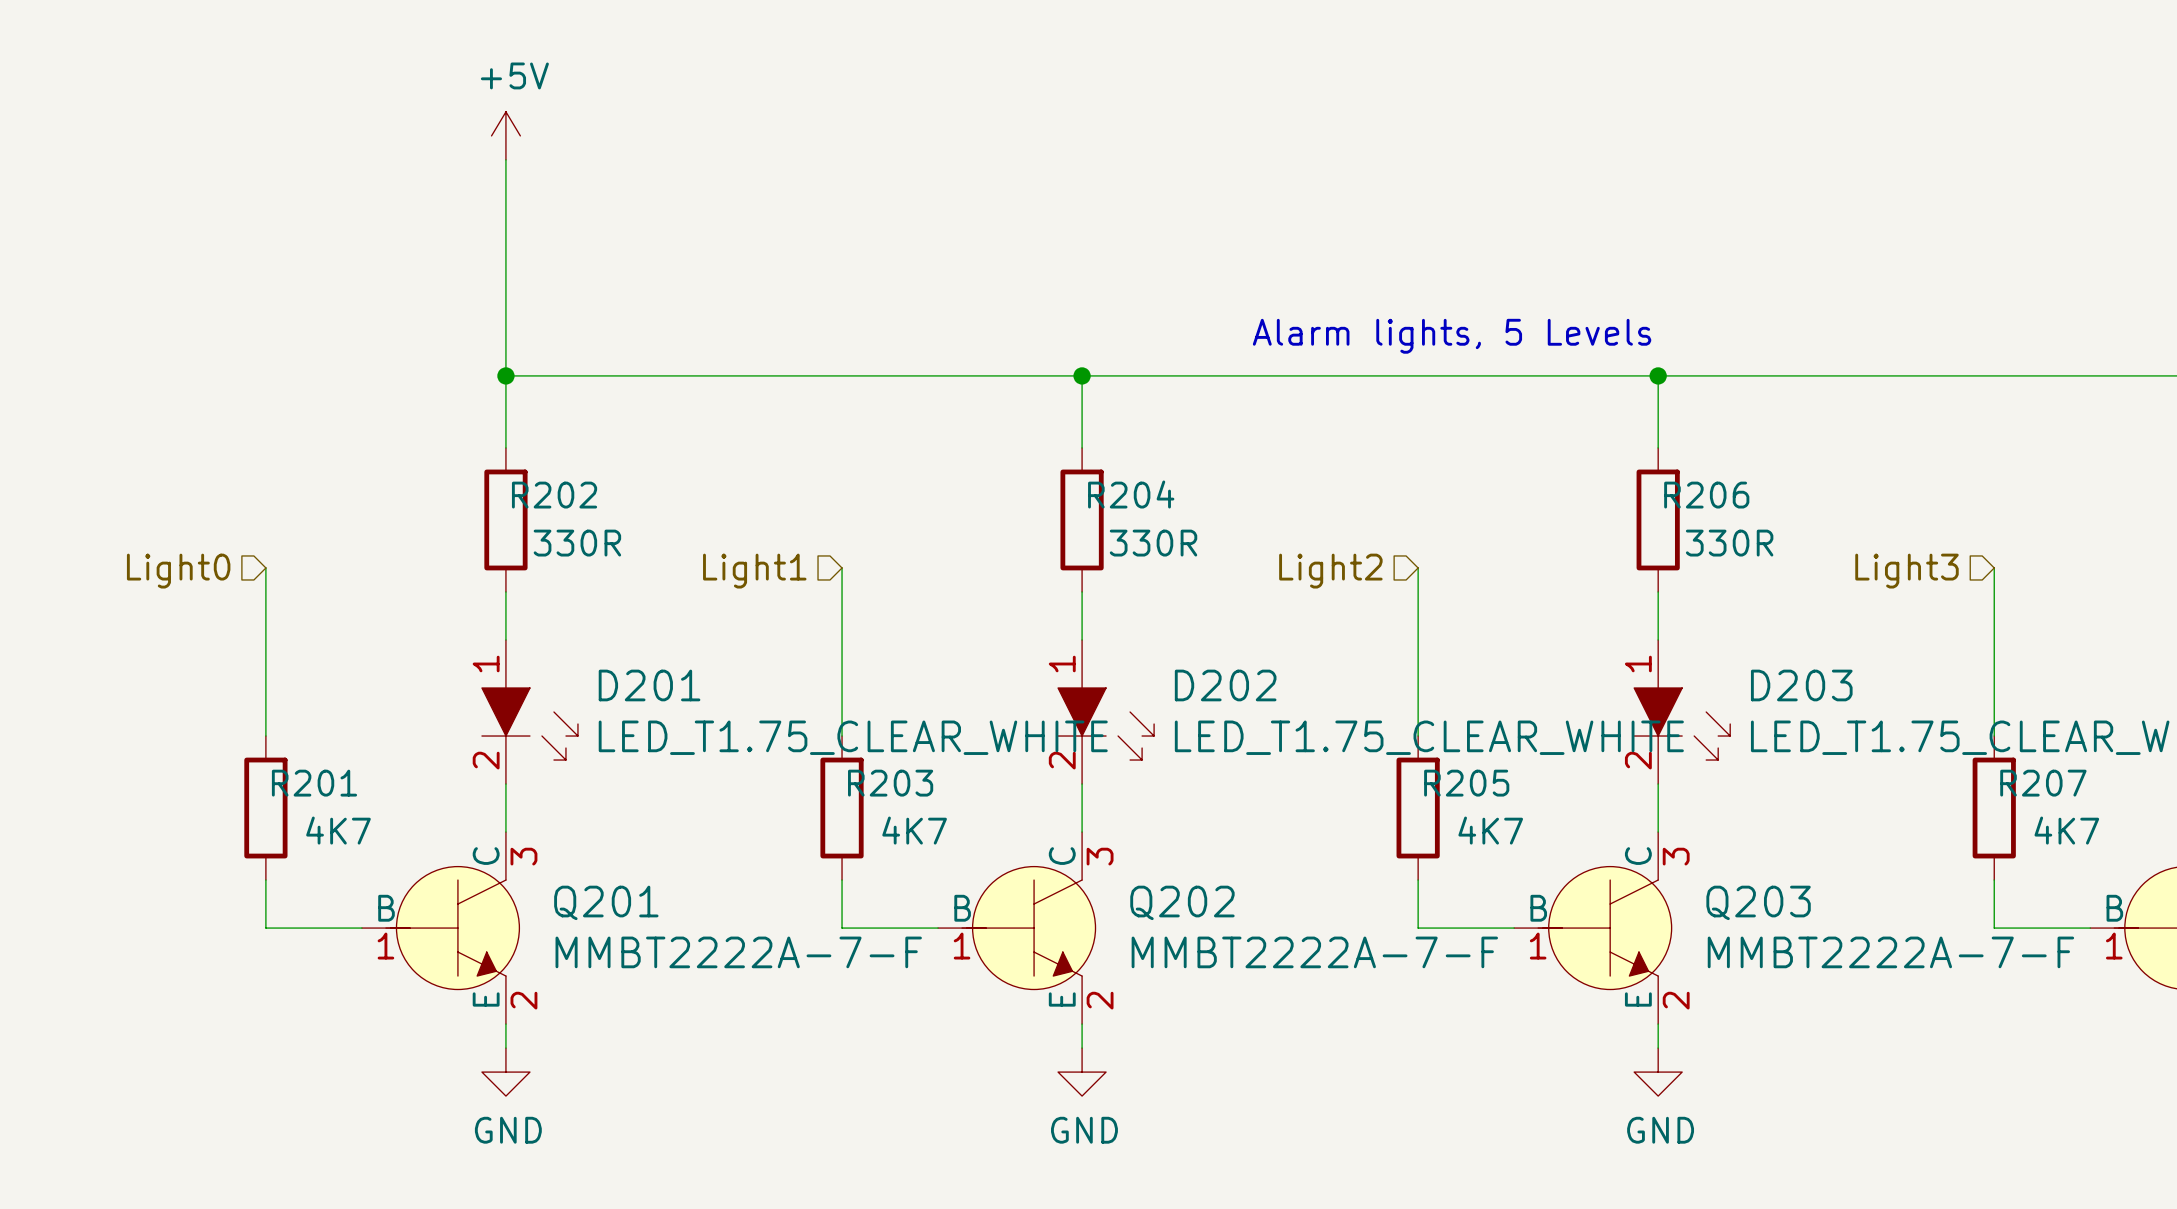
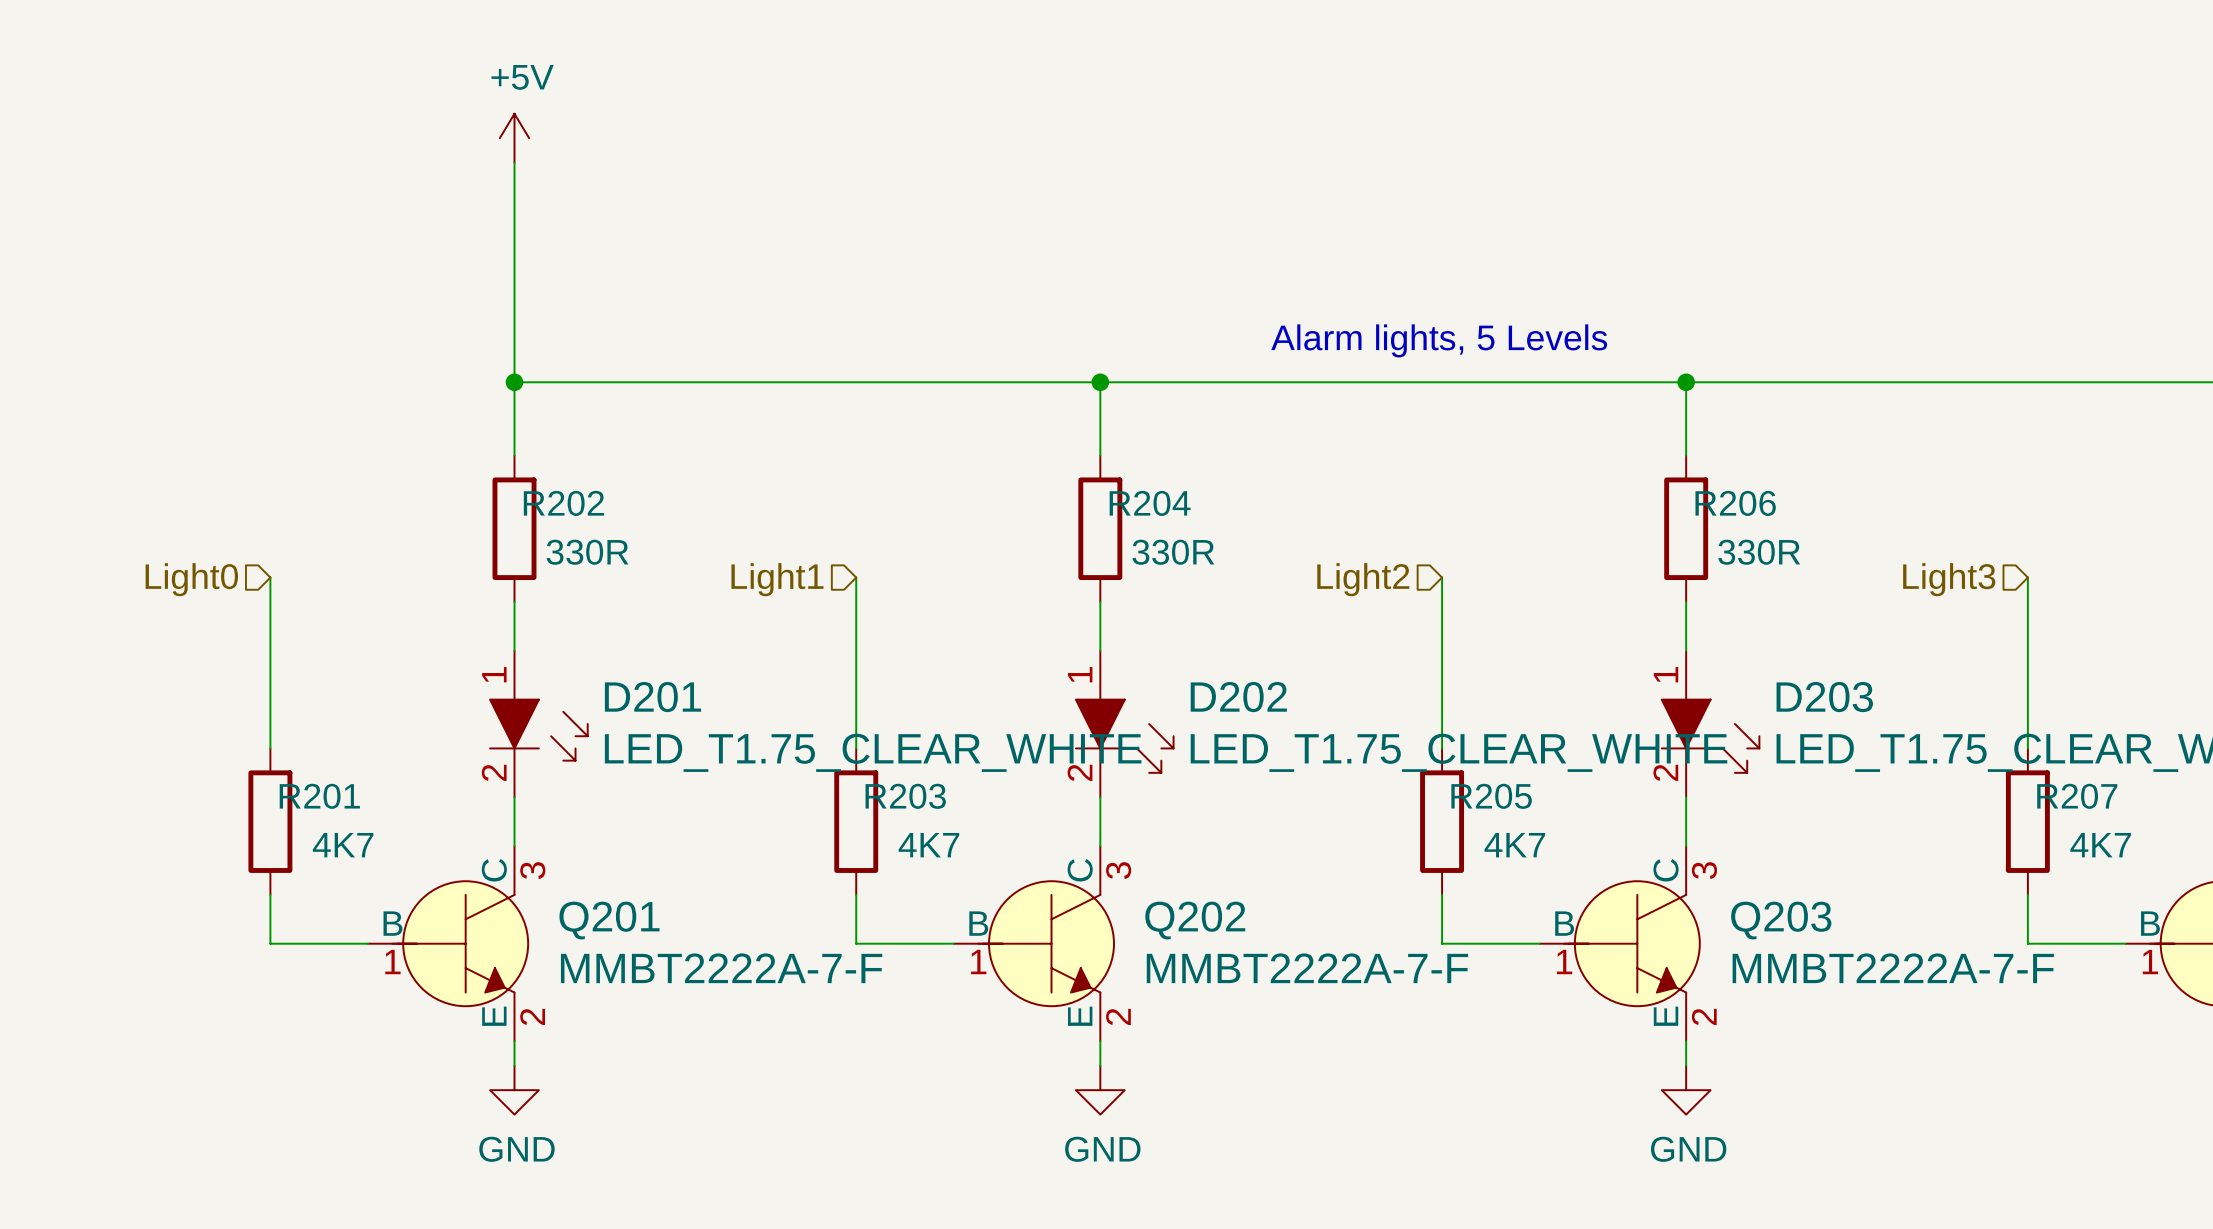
D201 symbol: [481, 639, 578, 785] -> [490, 650, 588, 798]

